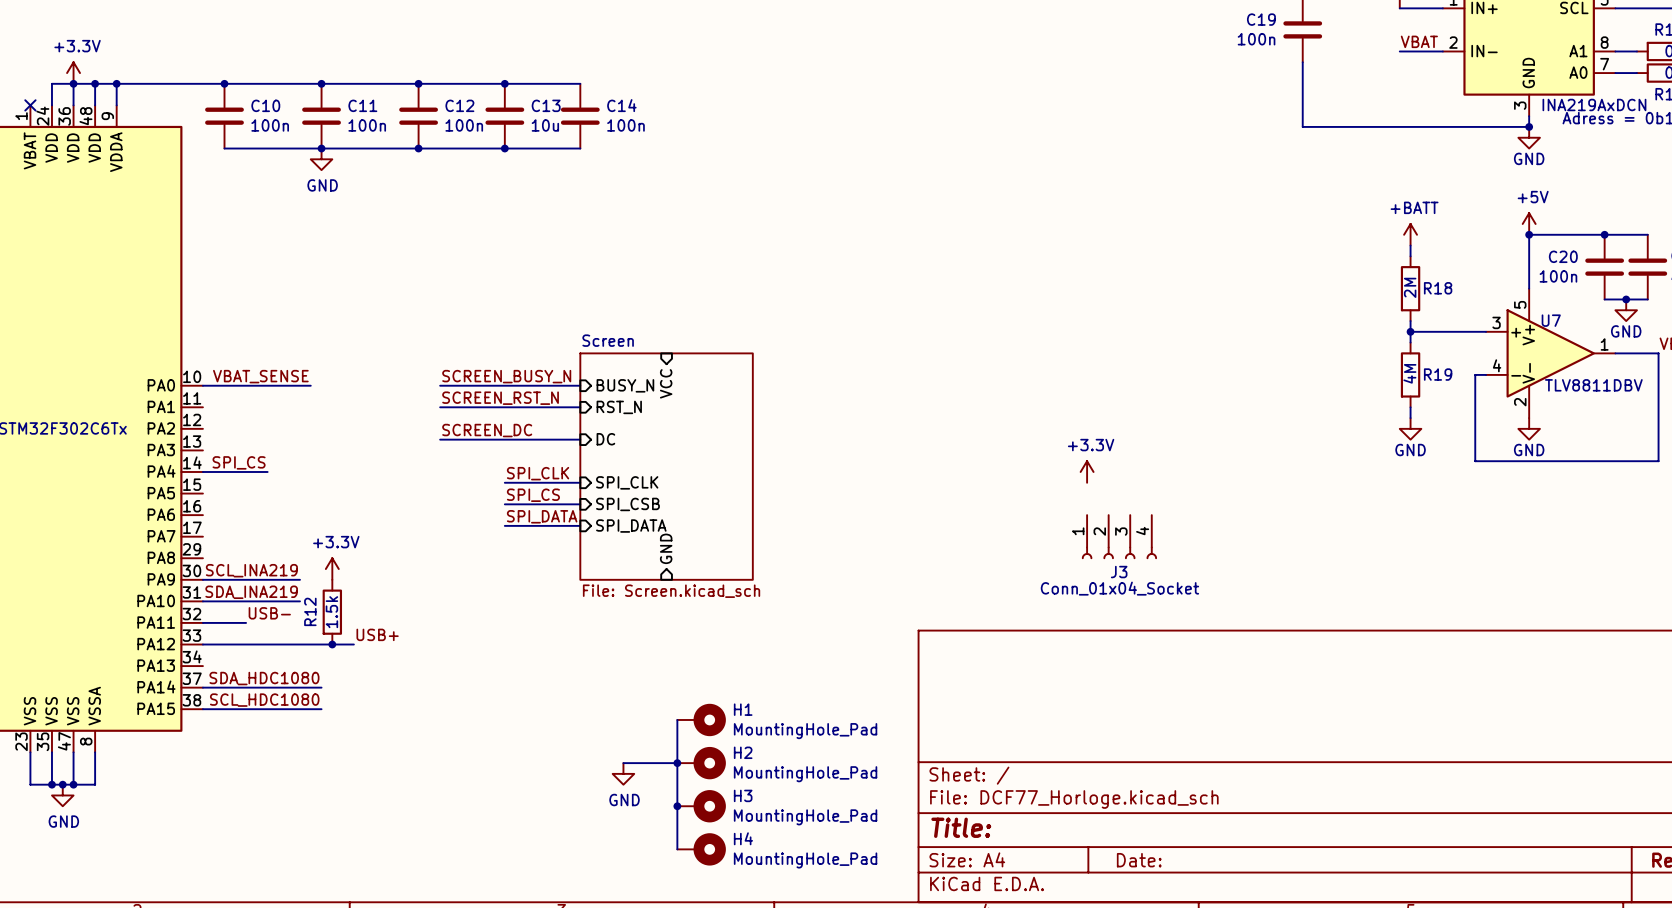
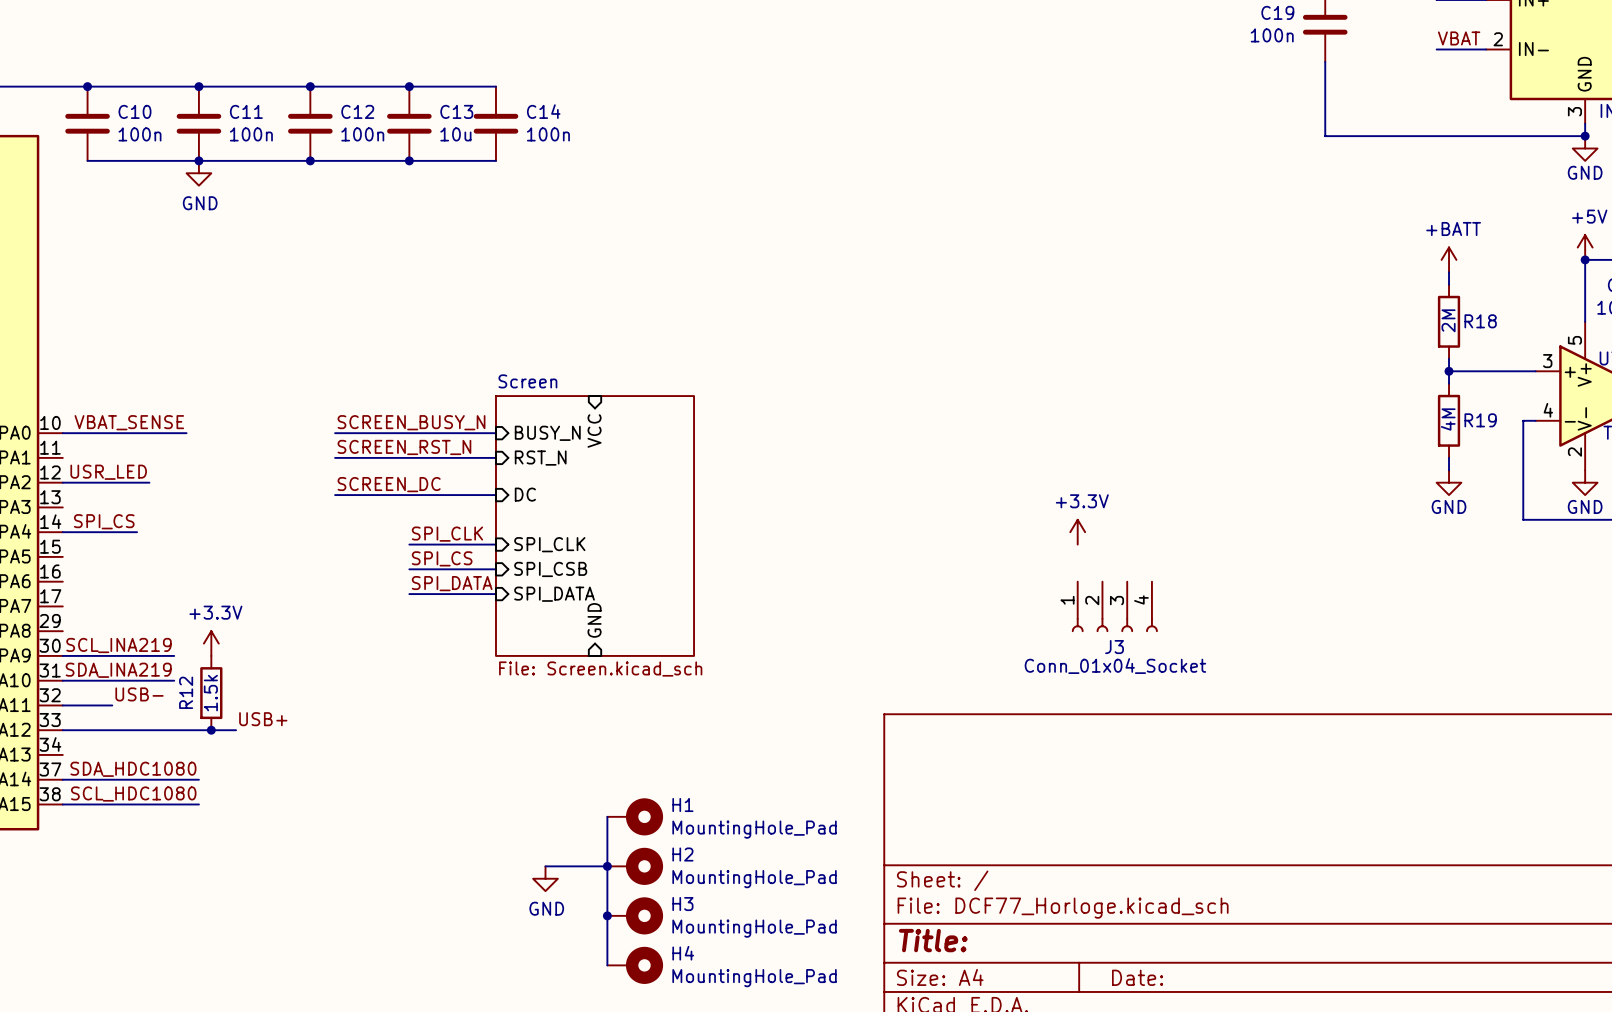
label: none -> USR_LED (108, 472)
wire: none -> (62, 482) (149, 482)

